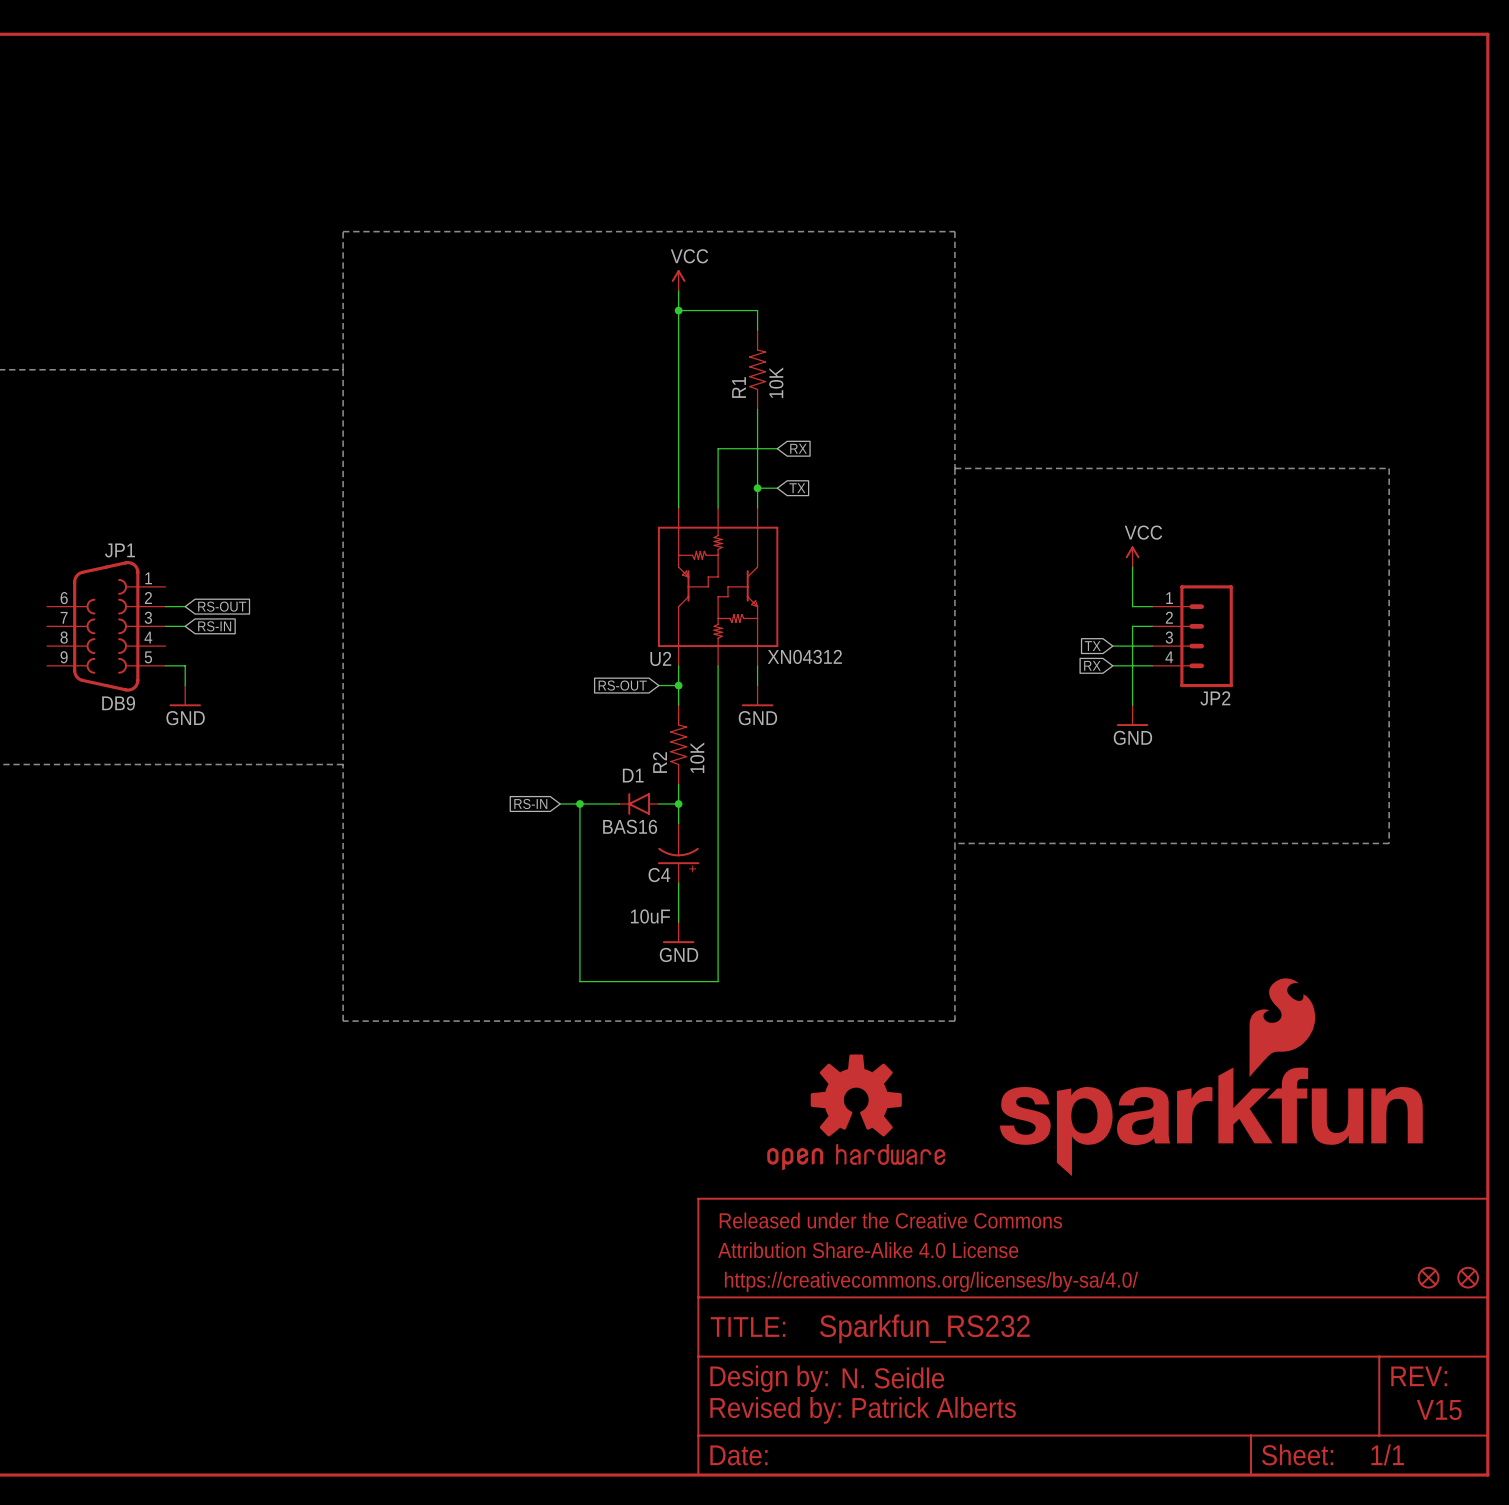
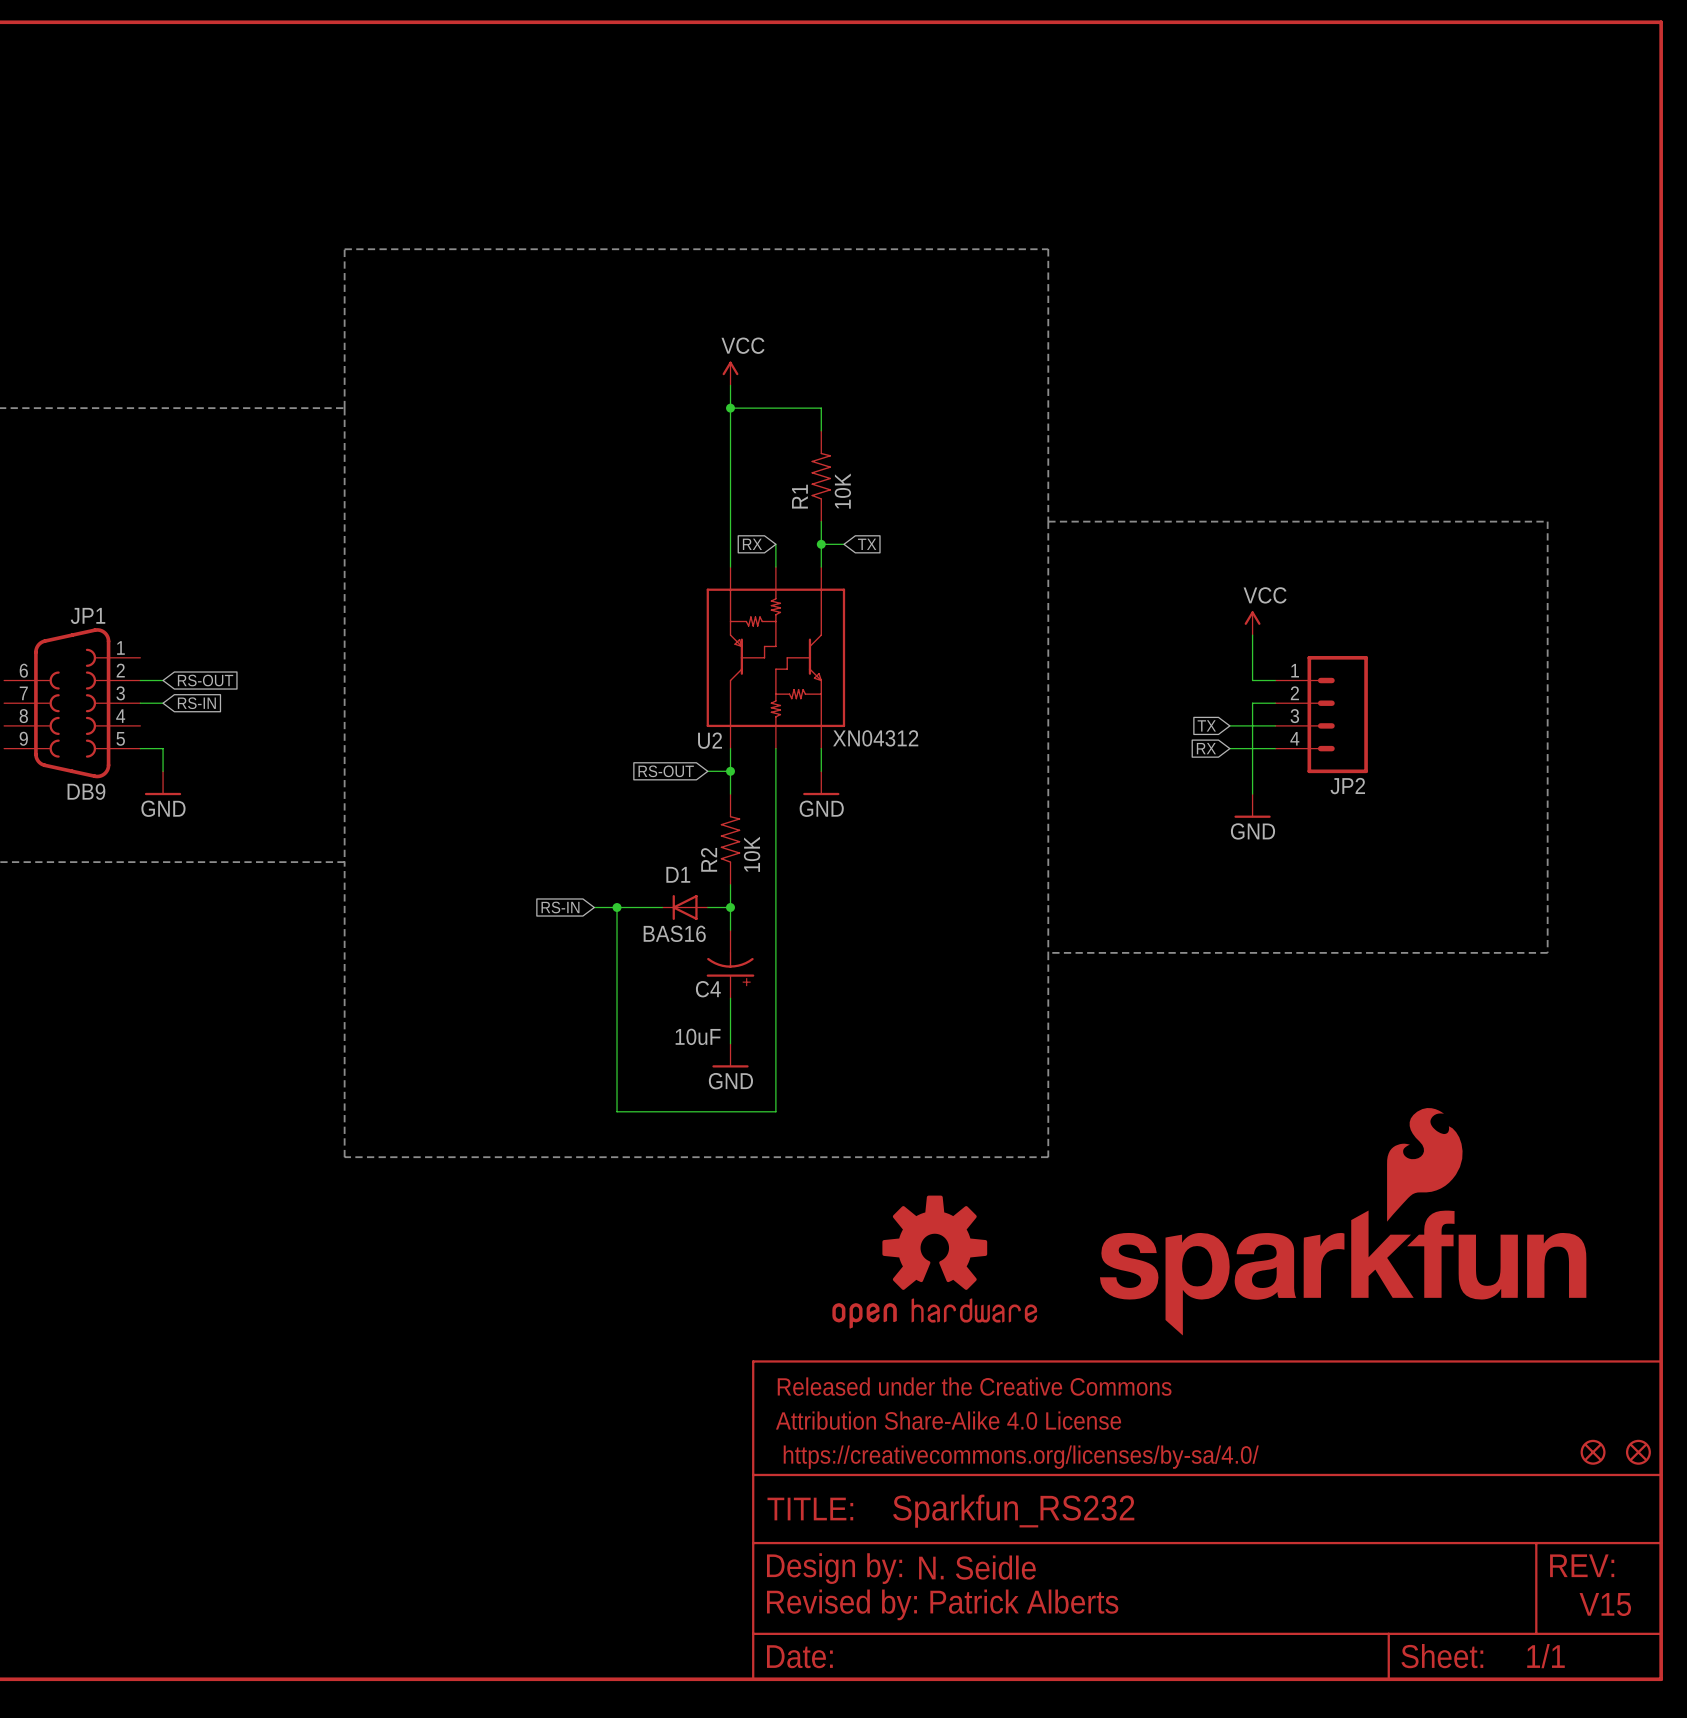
power symbol position: VCC (678, 280) -> VCC (730, 373)
wire: (678, 290) (678, 350) -> none
wire: (678, 310) (757, 310) (757, 330) -> (730, 408) (821, 408) (821, 430)
junction: (678, 310) -> none
junction: none -> (730, 408)
R1 position: (757, 369) -> (821, 476)
wire: (777, 448) (718, 448) (718, 488) -> none
global label rotation: 0° (798, 448) -> 180° (752, 544)
global label position: RX (798, 448) -> RX (752, 544)
D1 symbol: [618, 793, 660, 815] -> [662, 895, 708, 920]

